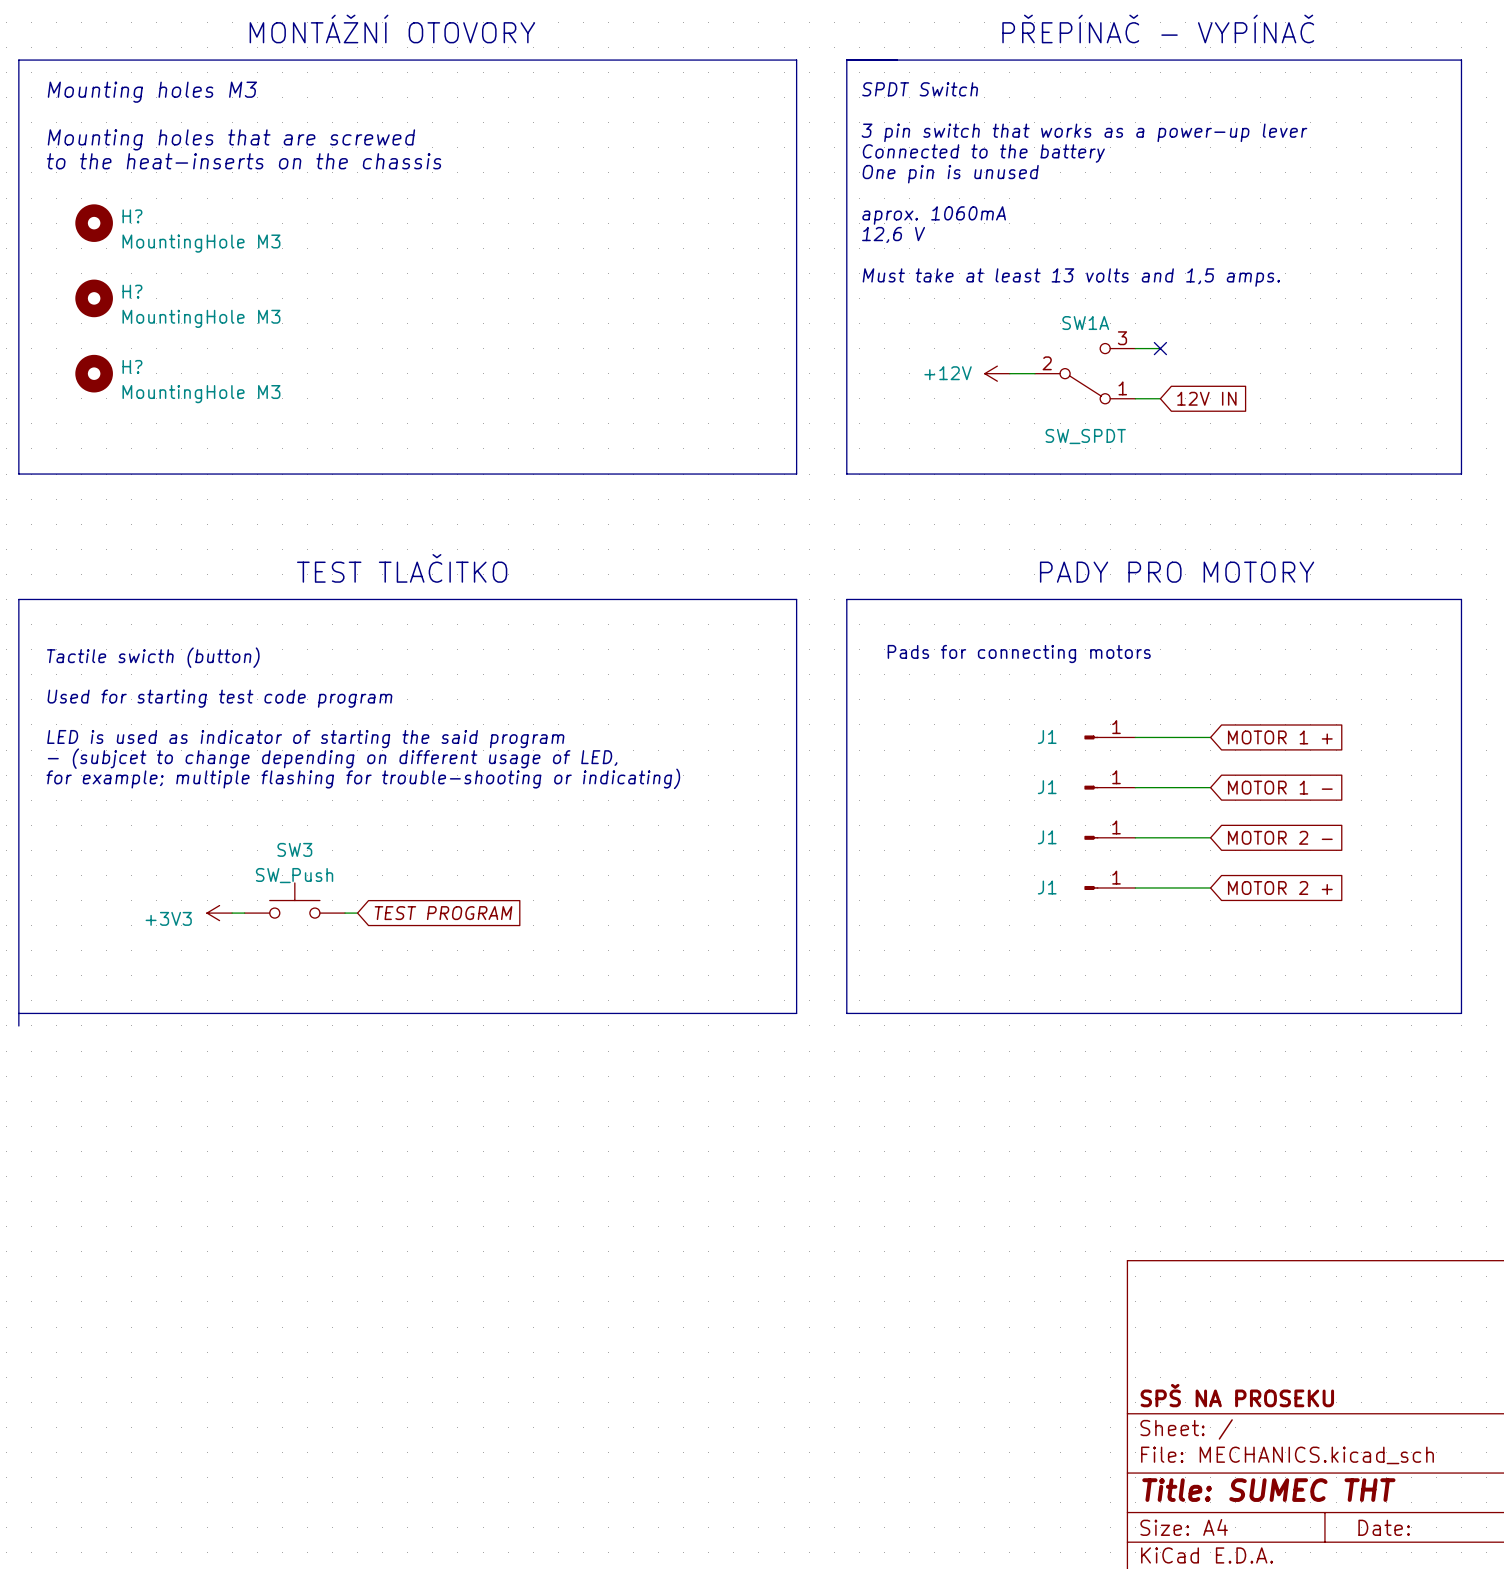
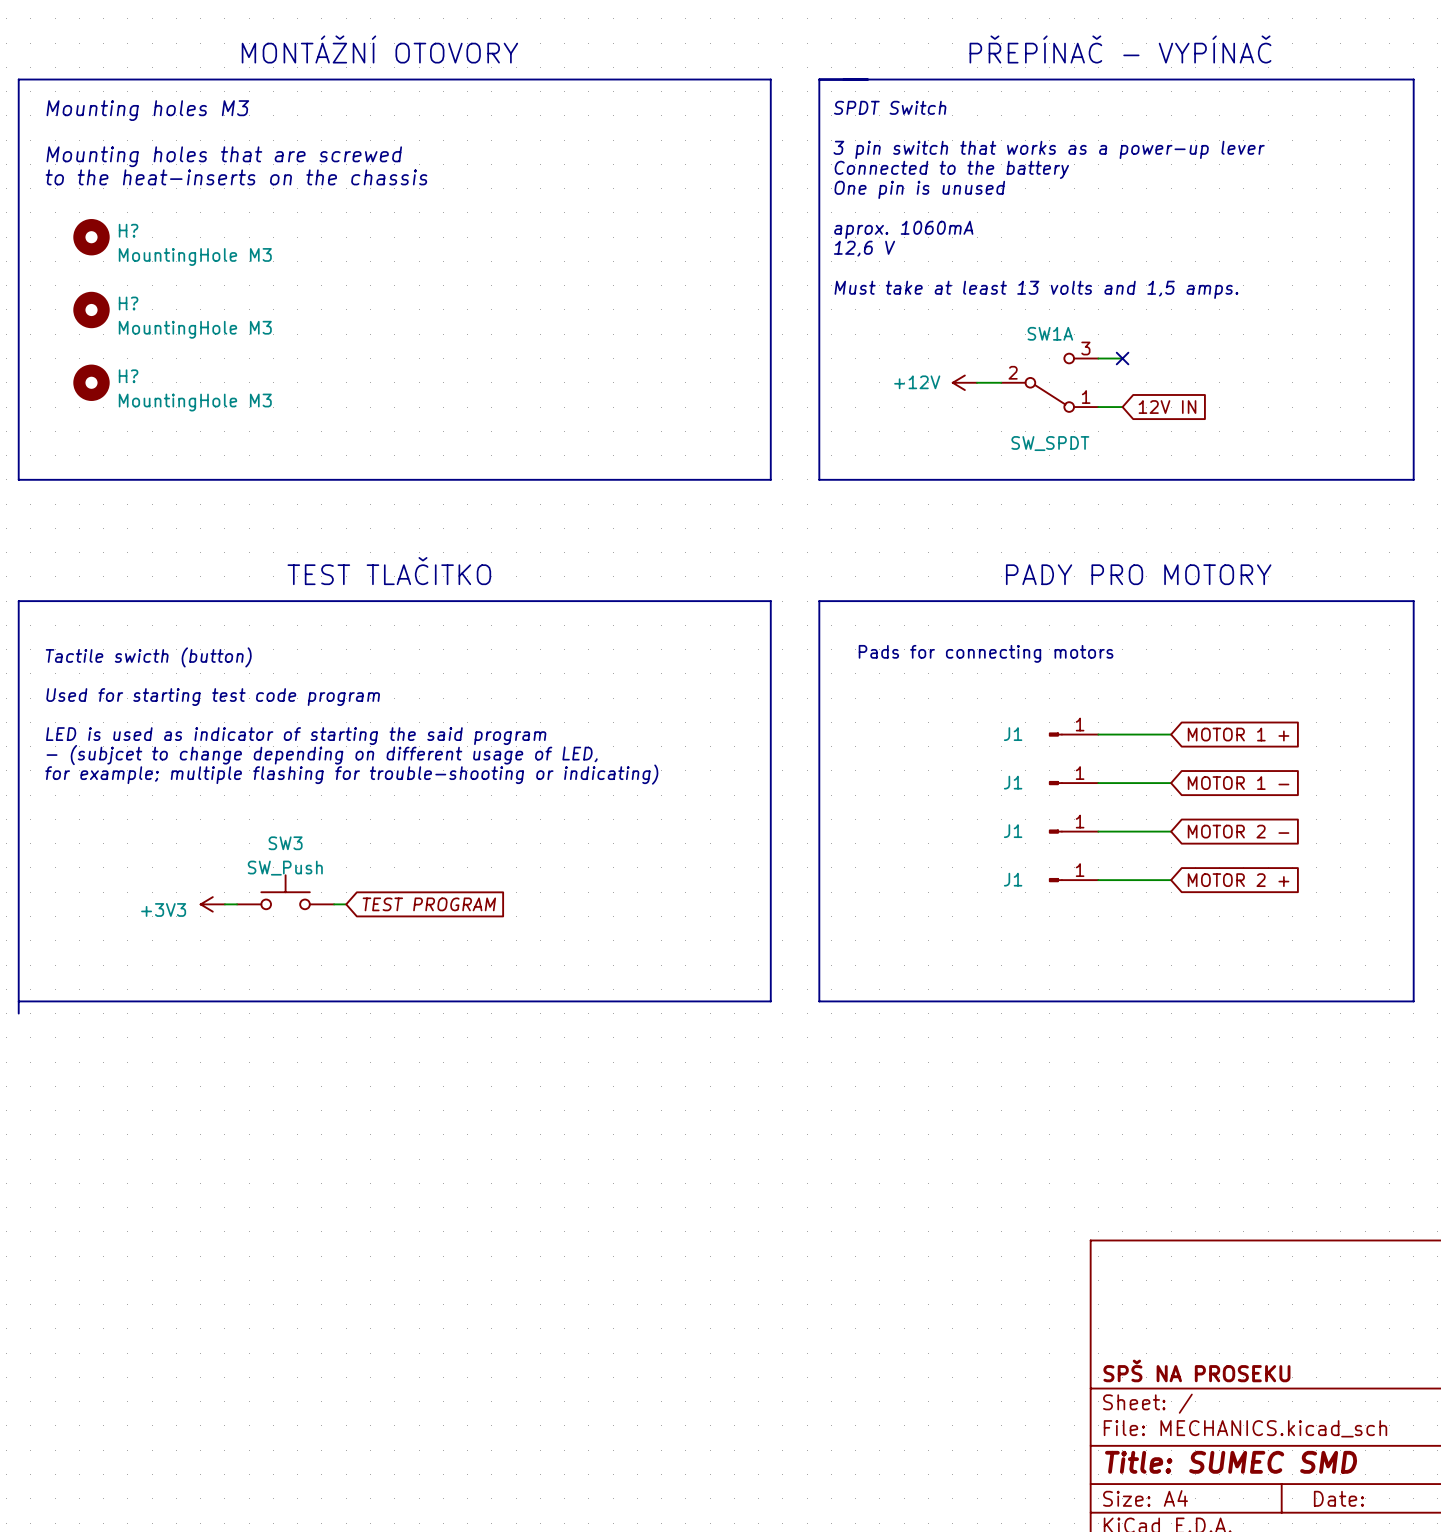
title block: Title: SUMEC THT (1268, 1490) -> Title: SUMEC SMD (1231, 1462)

